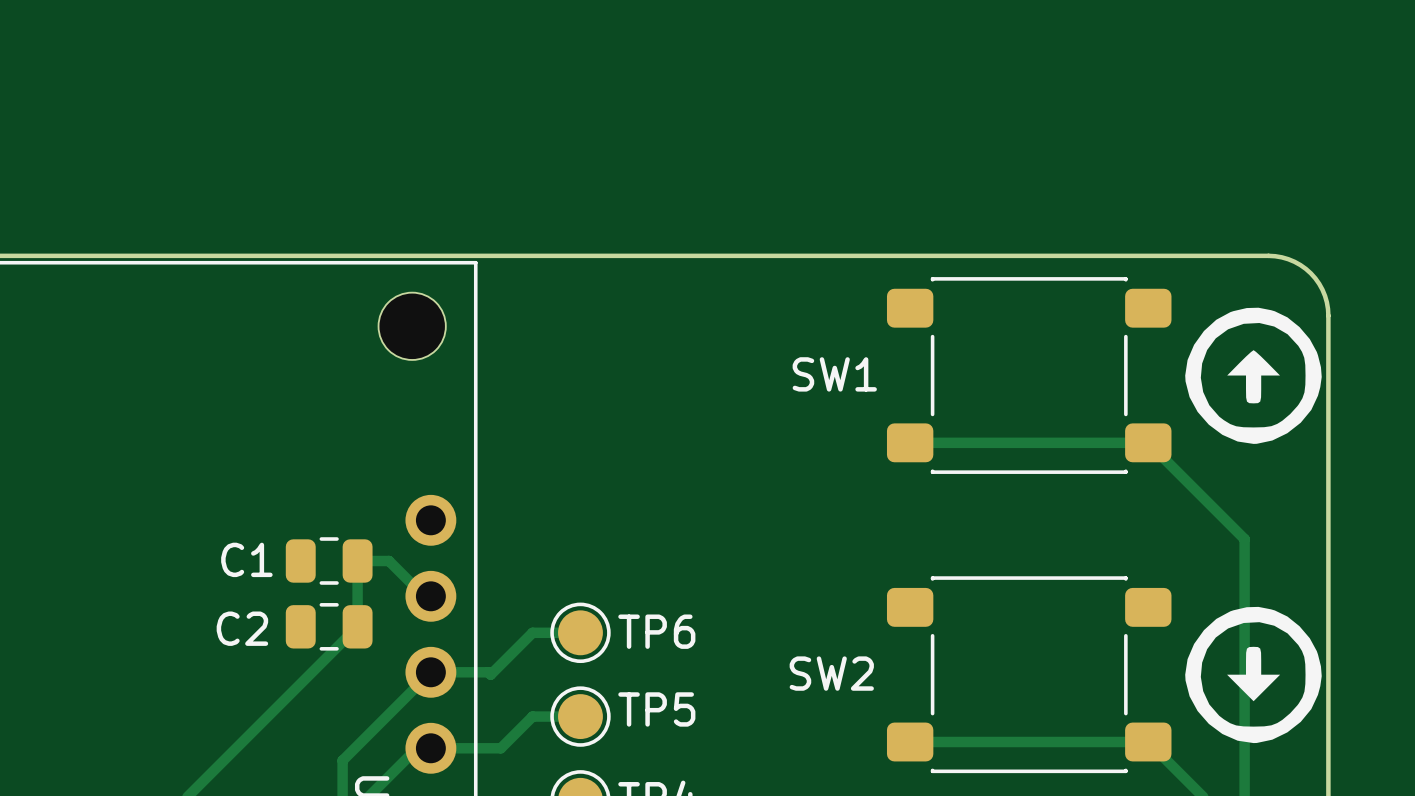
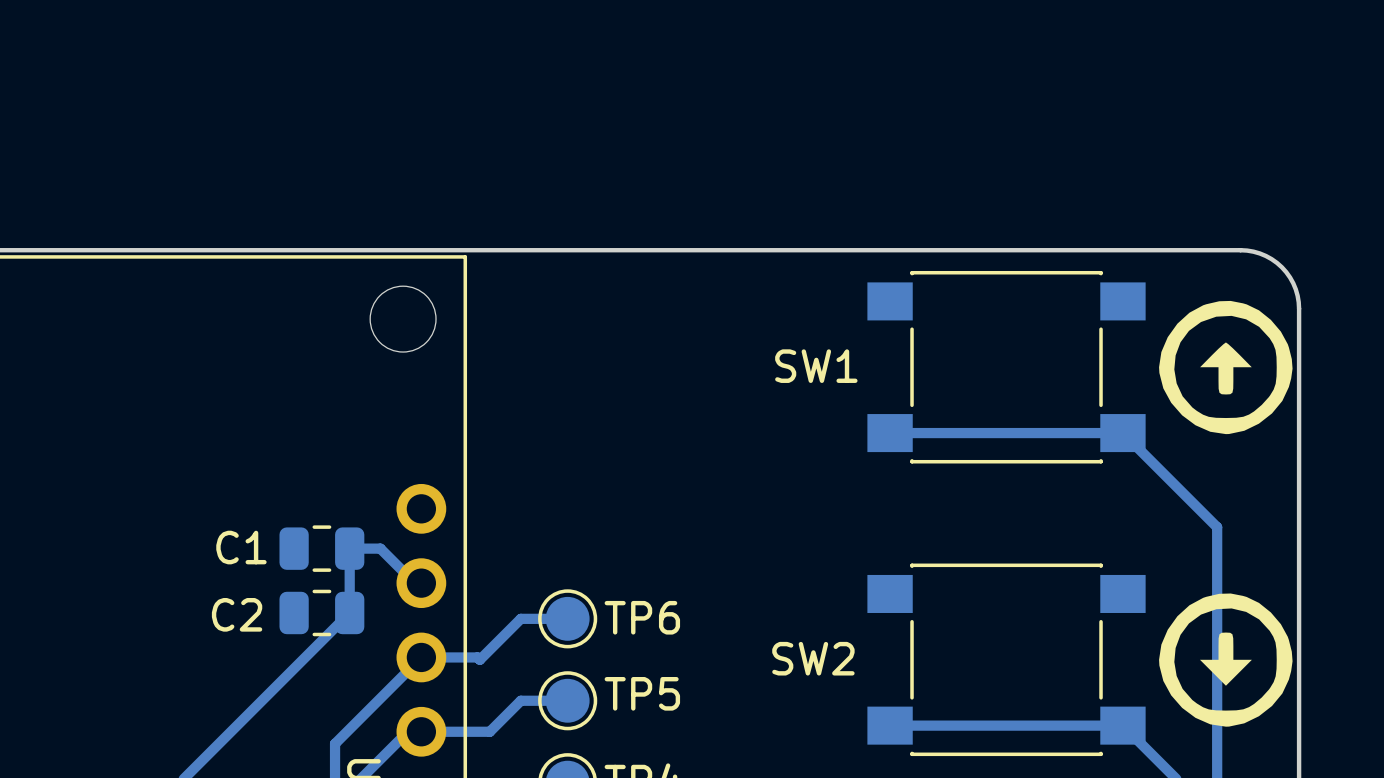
SW1 footprint: [886, 277, 1172, 474] -> [867, 270, 1146, 464]
SW2 footprint: [886, 576, 1172, 774] -> [867, 563, 1146, 757]

